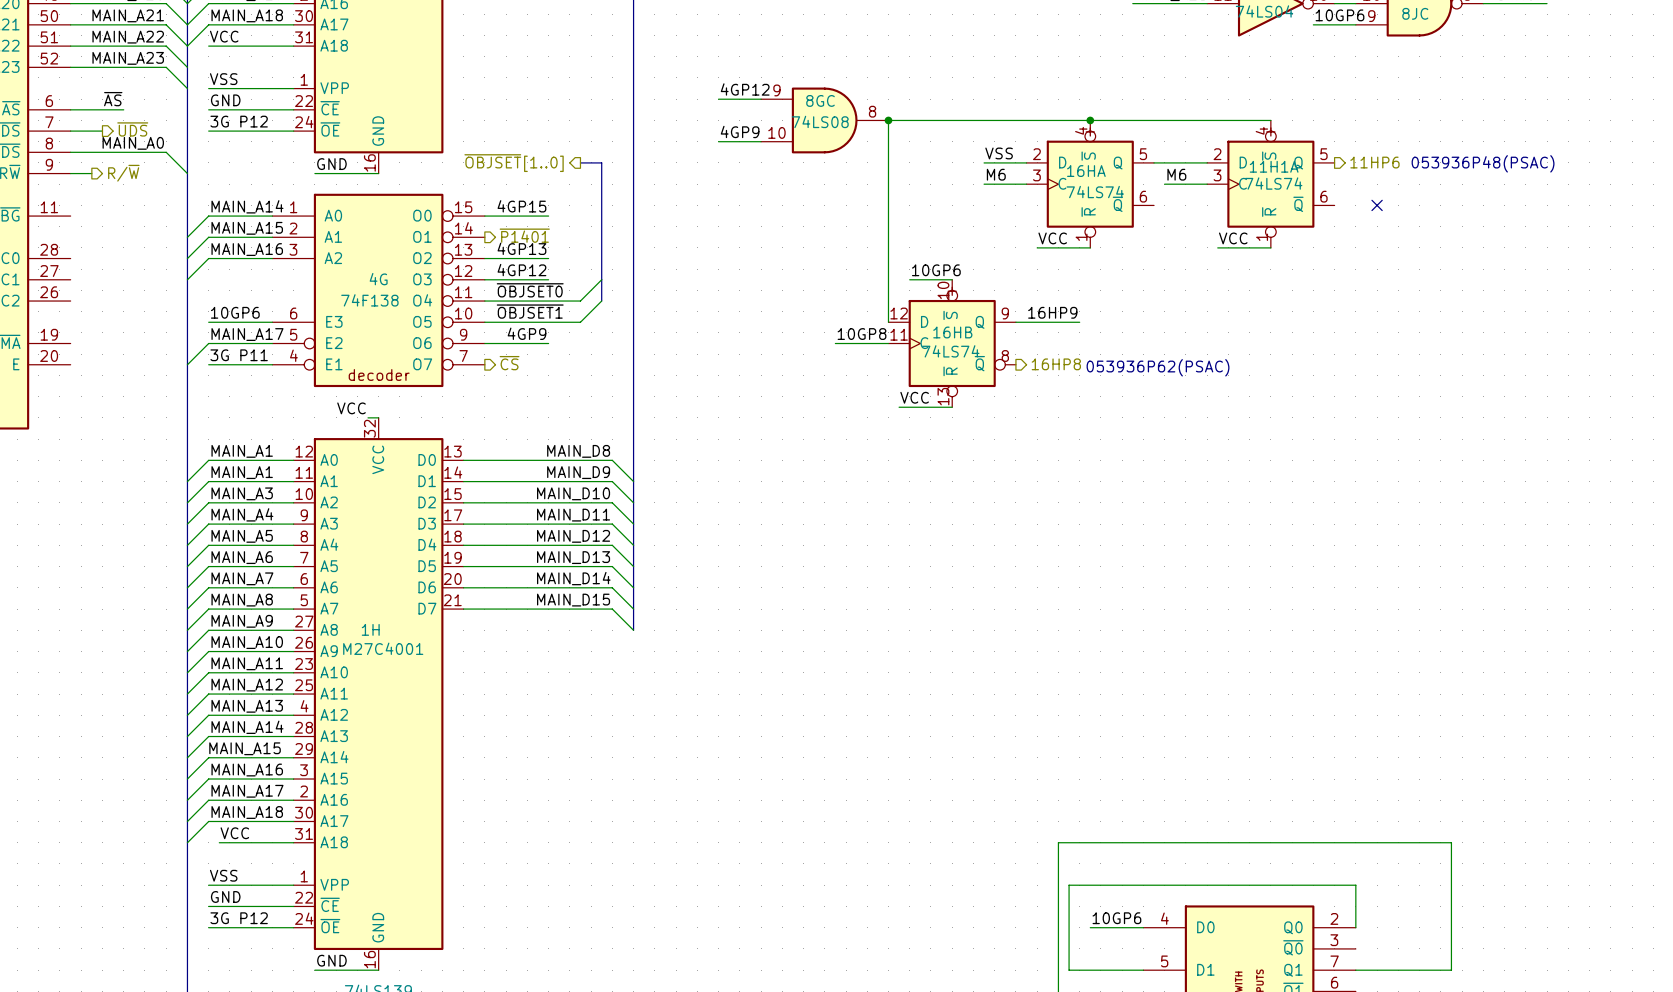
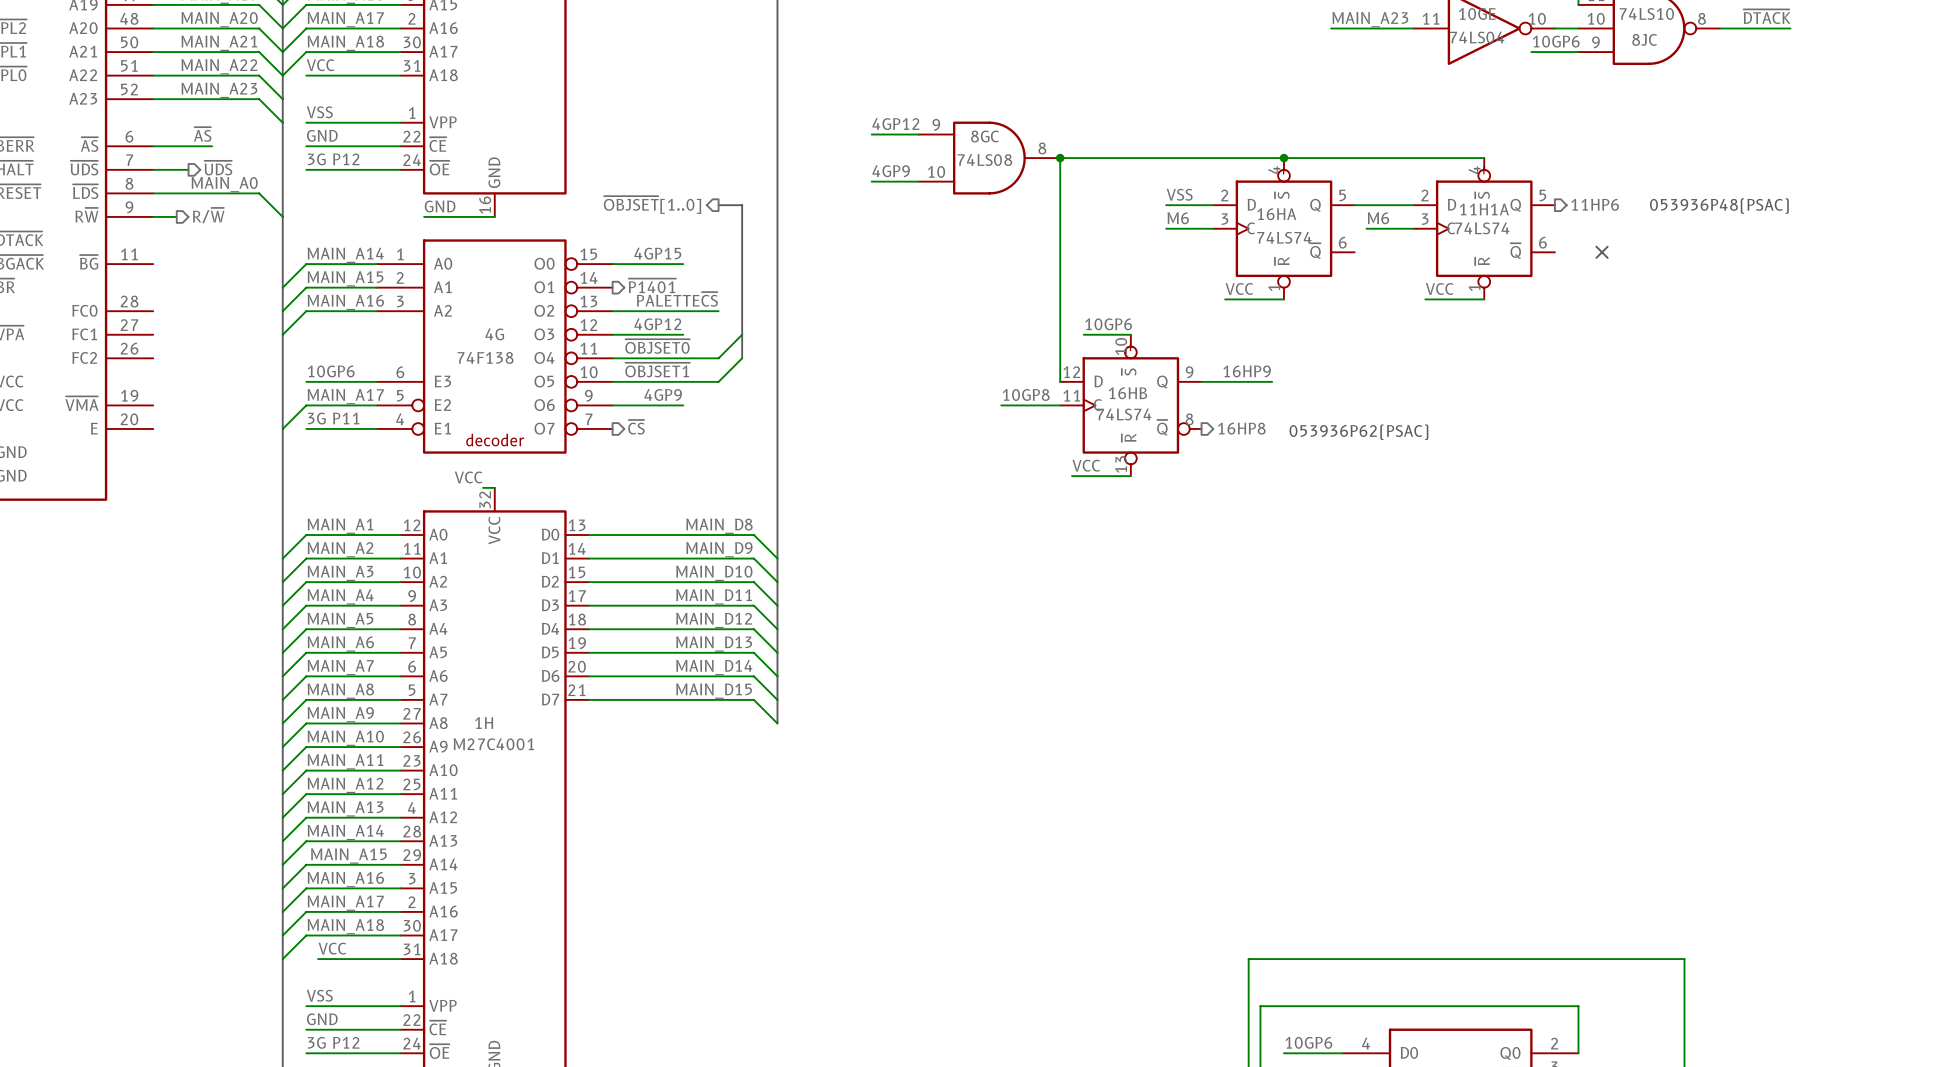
label: none -> PALETTE~{CS} (677, 299)
label: 4GP13 (521, 248) -> none
wire: none -> (683, 311) (718, 311)
label: MAIN_A1 (242, 472) -> MAIN_A2 (340, 549)

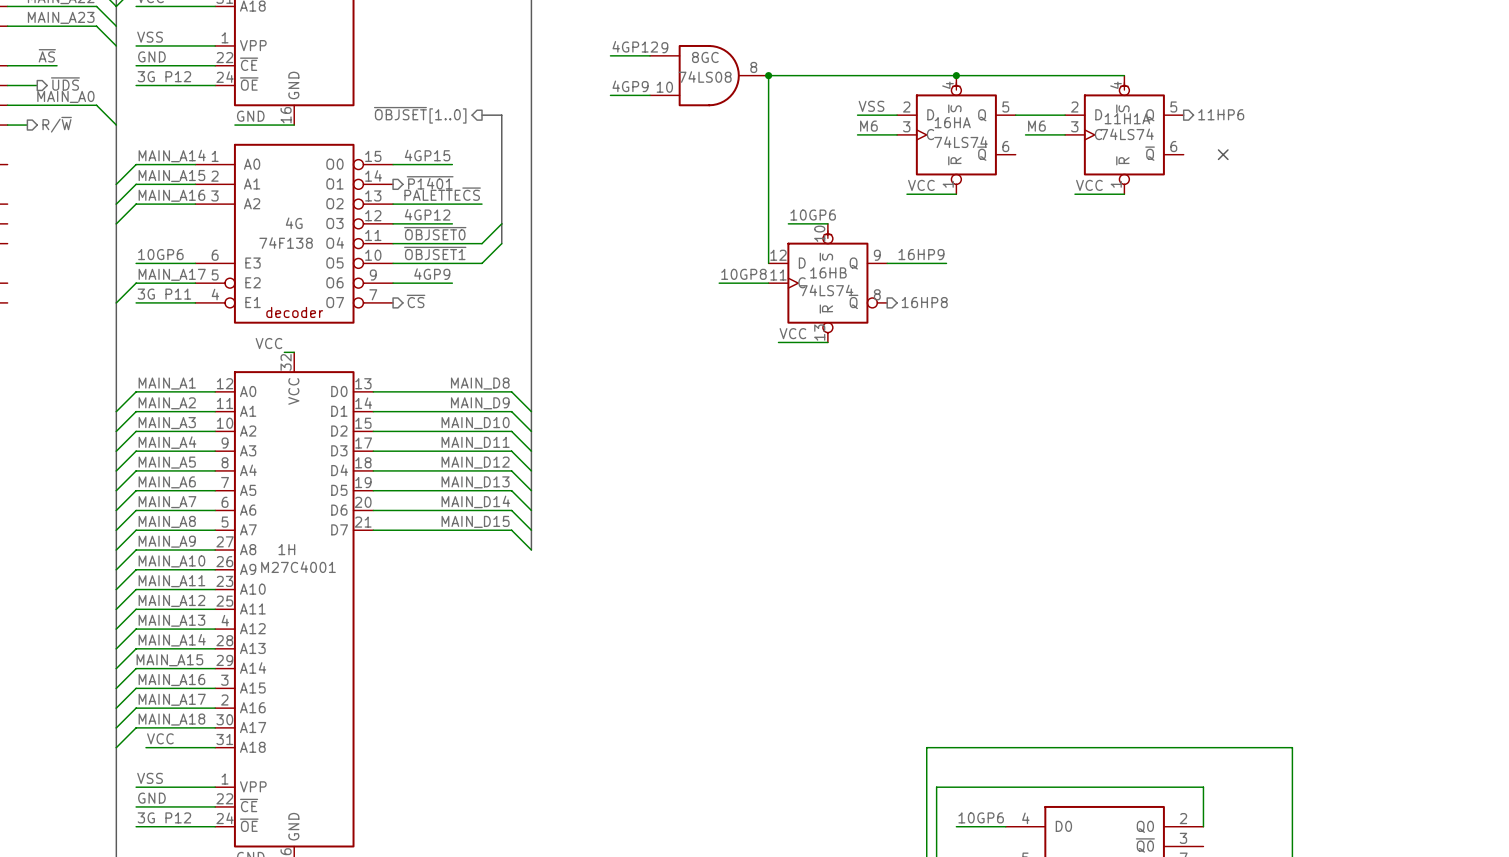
text: 053936P48(PSAC) (1719, 206) -> none
text: 053936P62(PSAC) (1358, 432) -> none

